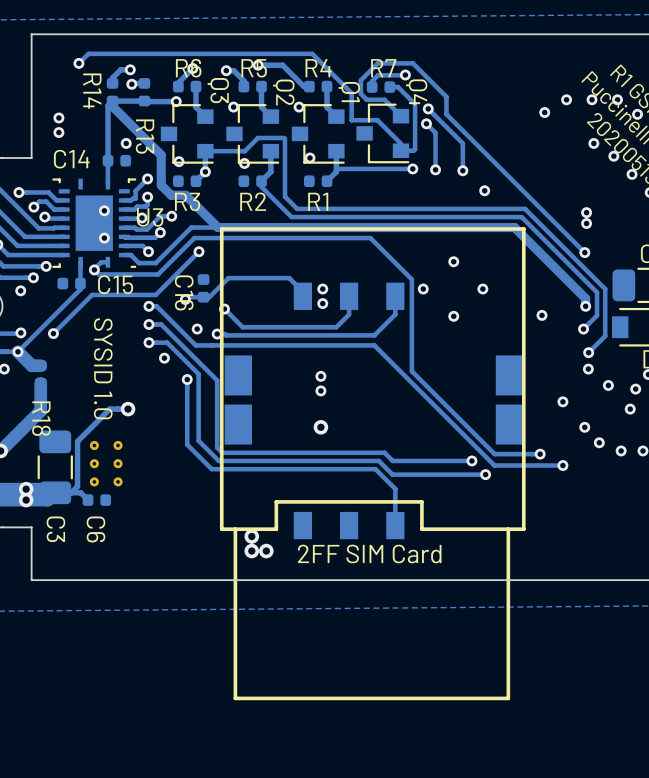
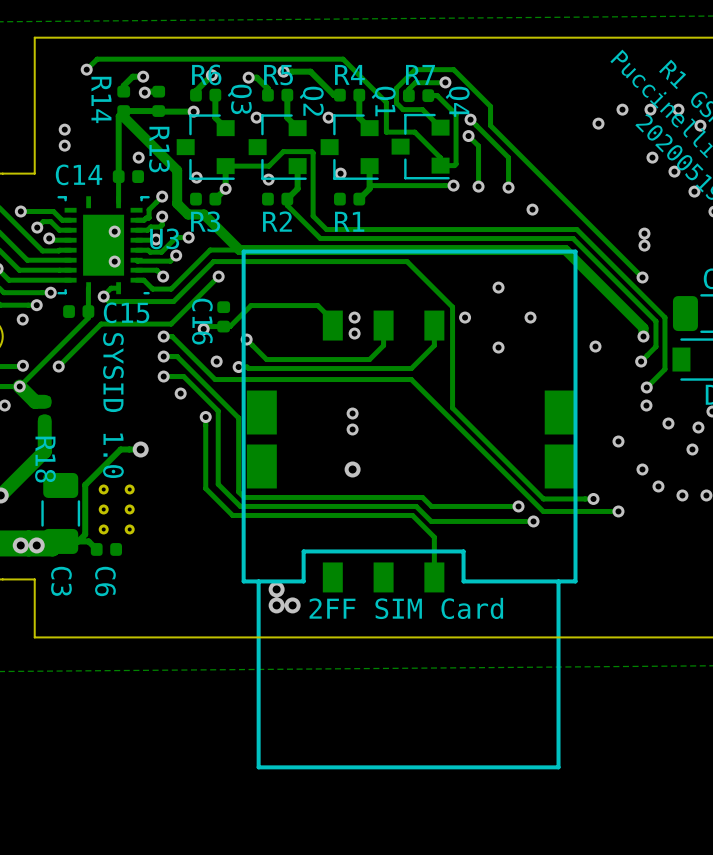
via: (26, 489) -> none
via: none -> (20, 545)
via: none -> (36, 545)
via: (26, 500) -> none

